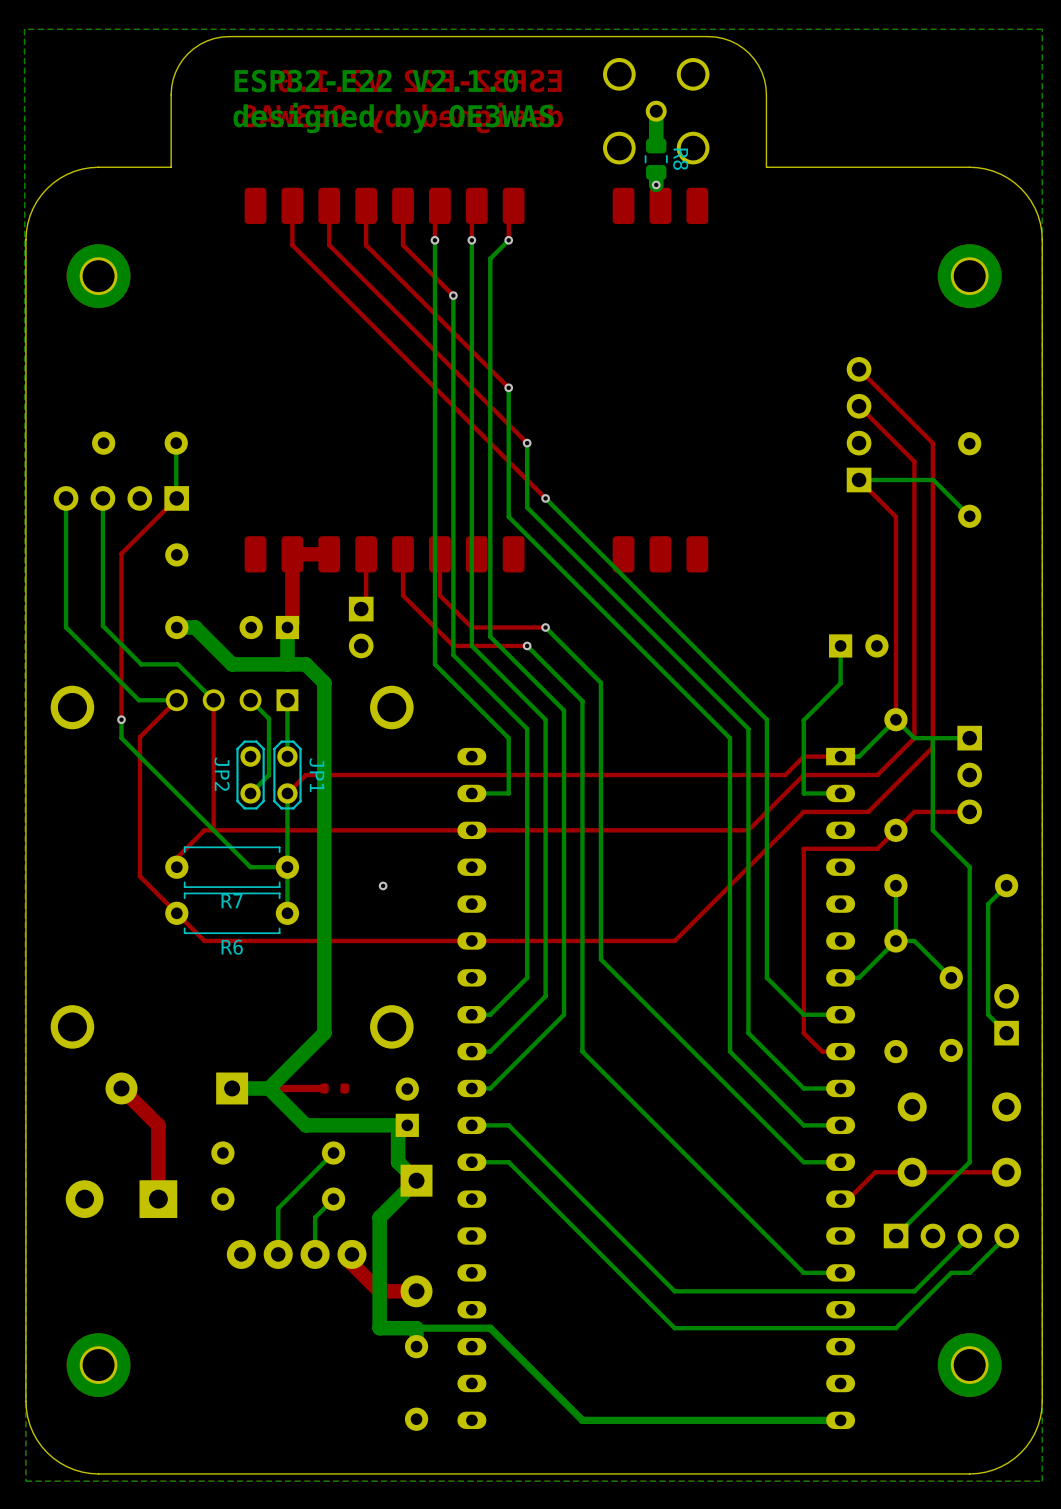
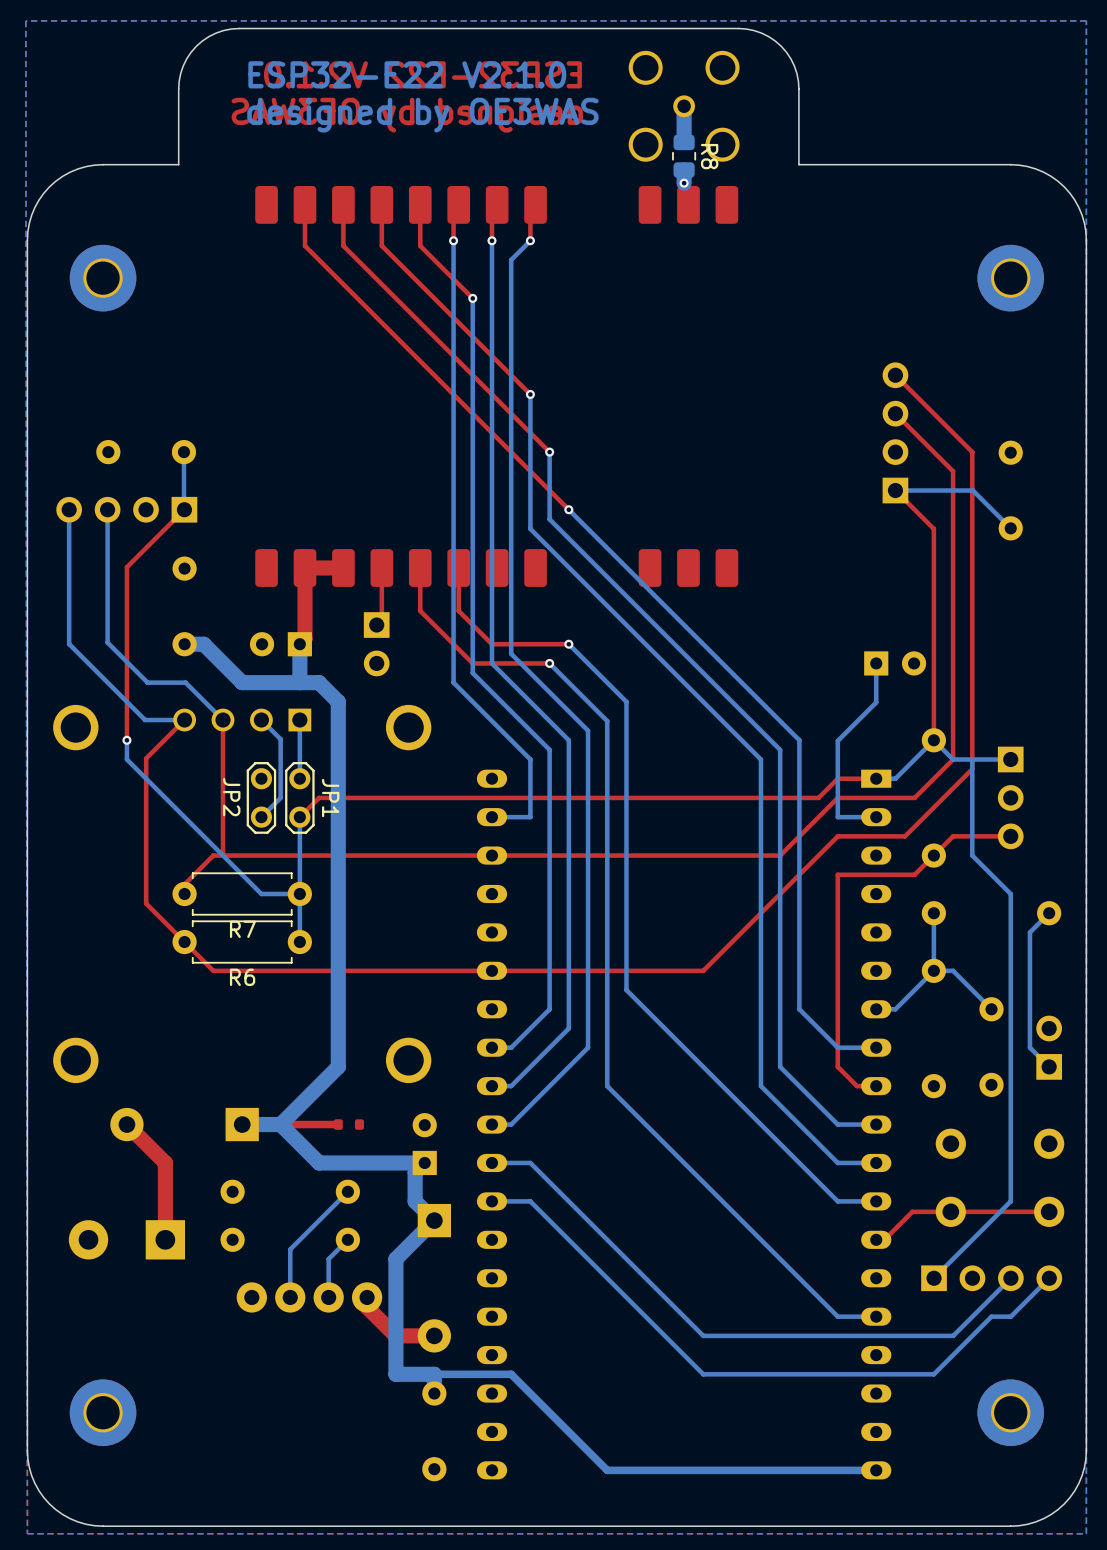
via: (383, 885) -> none

